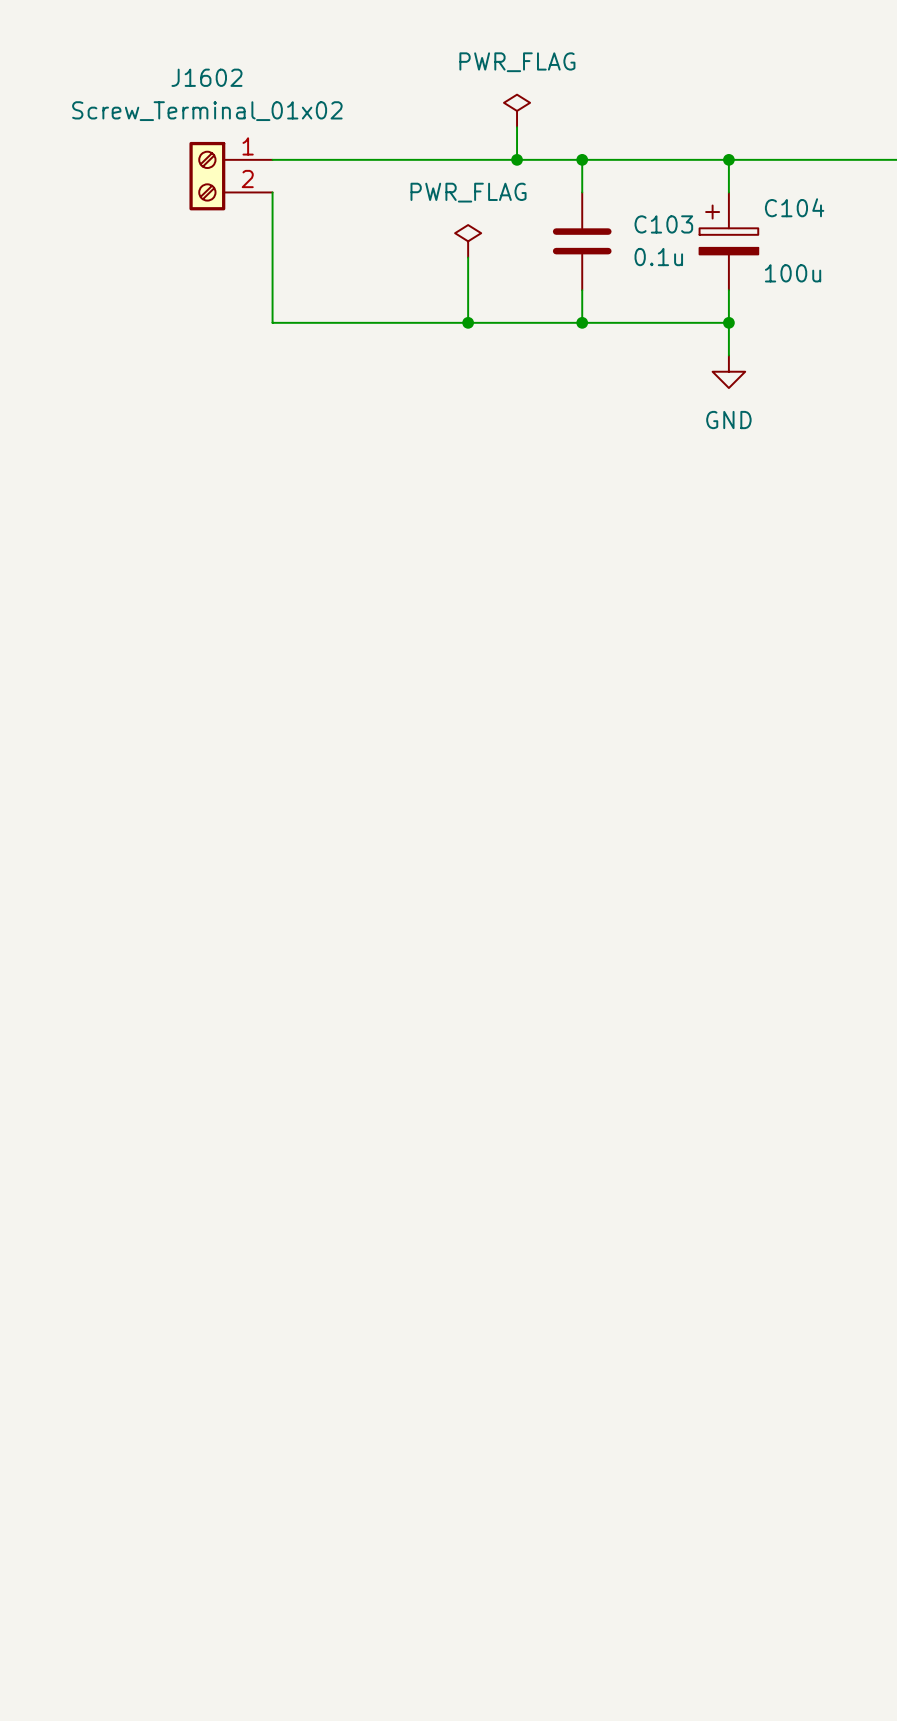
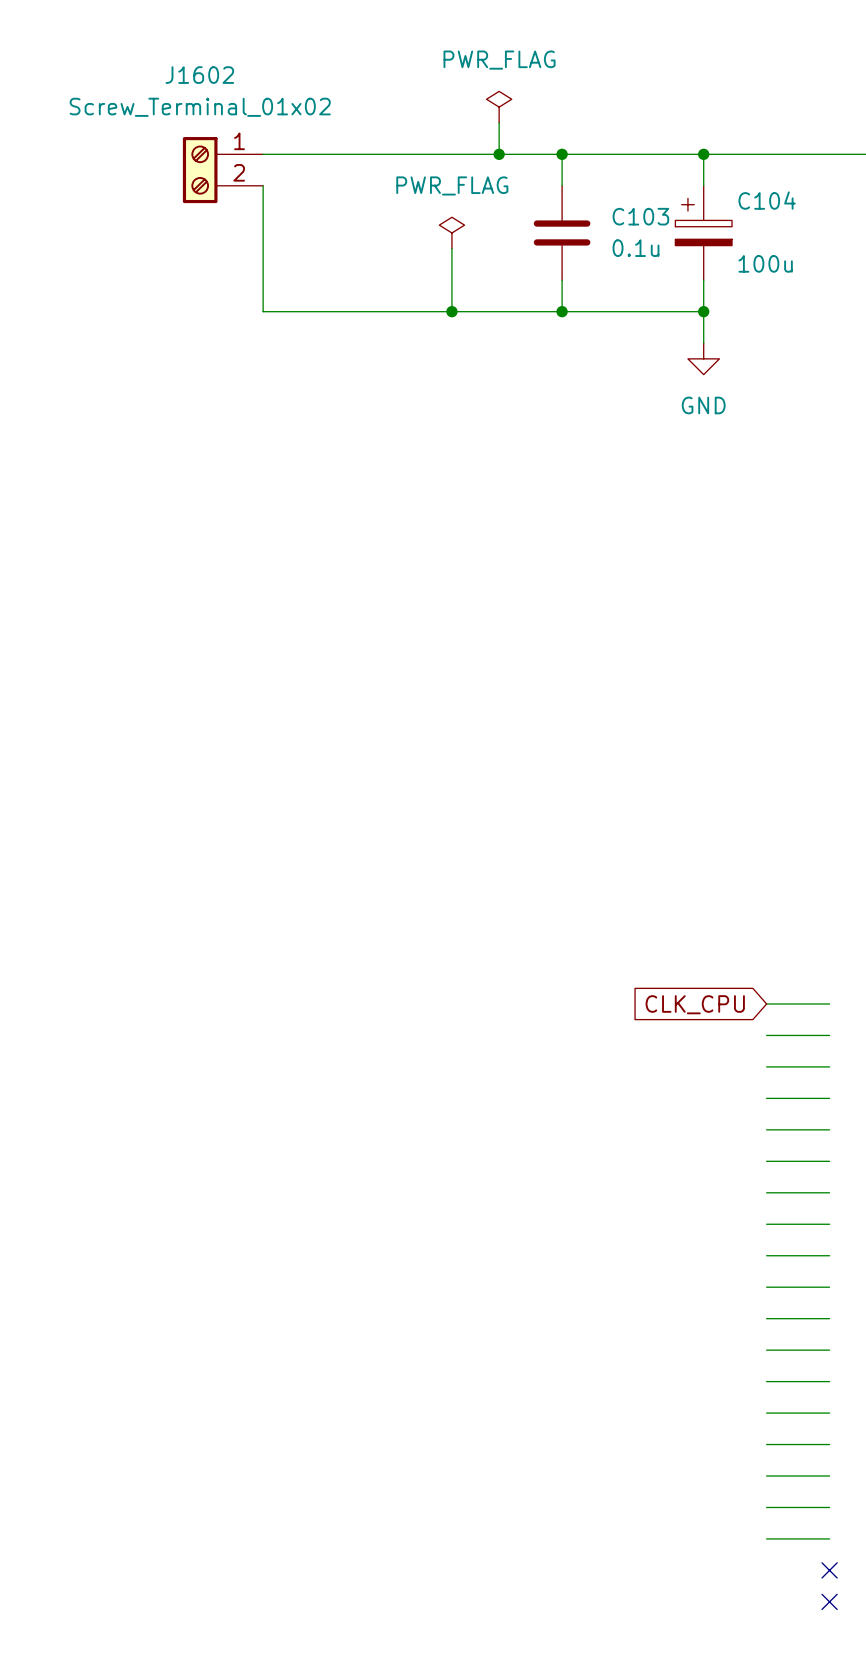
wire: none -> (766, 1003) (829, 1003)
global label: none -> CLK_CPU (695, 1004)
wire: none -> (766, 1035) (829, 1035)
wire: none -> (766, 1066) (829, 1066)
wire: none -> (766, 1098) (829, 1098)
wire: none -> (766, 1129) (829, 1129)
wire: none -> (766, 1161) (829, 1161)
wire: none -> (766, 1192) (829, 1192)
wire: none -> (766, 1224) (829, 1224)
wire: none -> (766, 1255) (829, 1255)
wire: none -> (766, 1287) (829, 1287)
wire: none -> (766, 1318) (829, 1318)
wire: none -> (766, 1350) (829, 1350)
wire: none -> (766, 1381) (829, 1381)
wire: none -> (766, 1413) (829, 1413)
wire: none -> (766, 1444) (829, 1444)
wire: none -> (766, 1476) (829, 1476)
wire: none -> (766, 1507) (829, 1507)
wire: none -> (766, 1538) (829, 1538)
no-connect mark: none -> (829, 1570)
no-connect mark: none -> (829, 1601)

